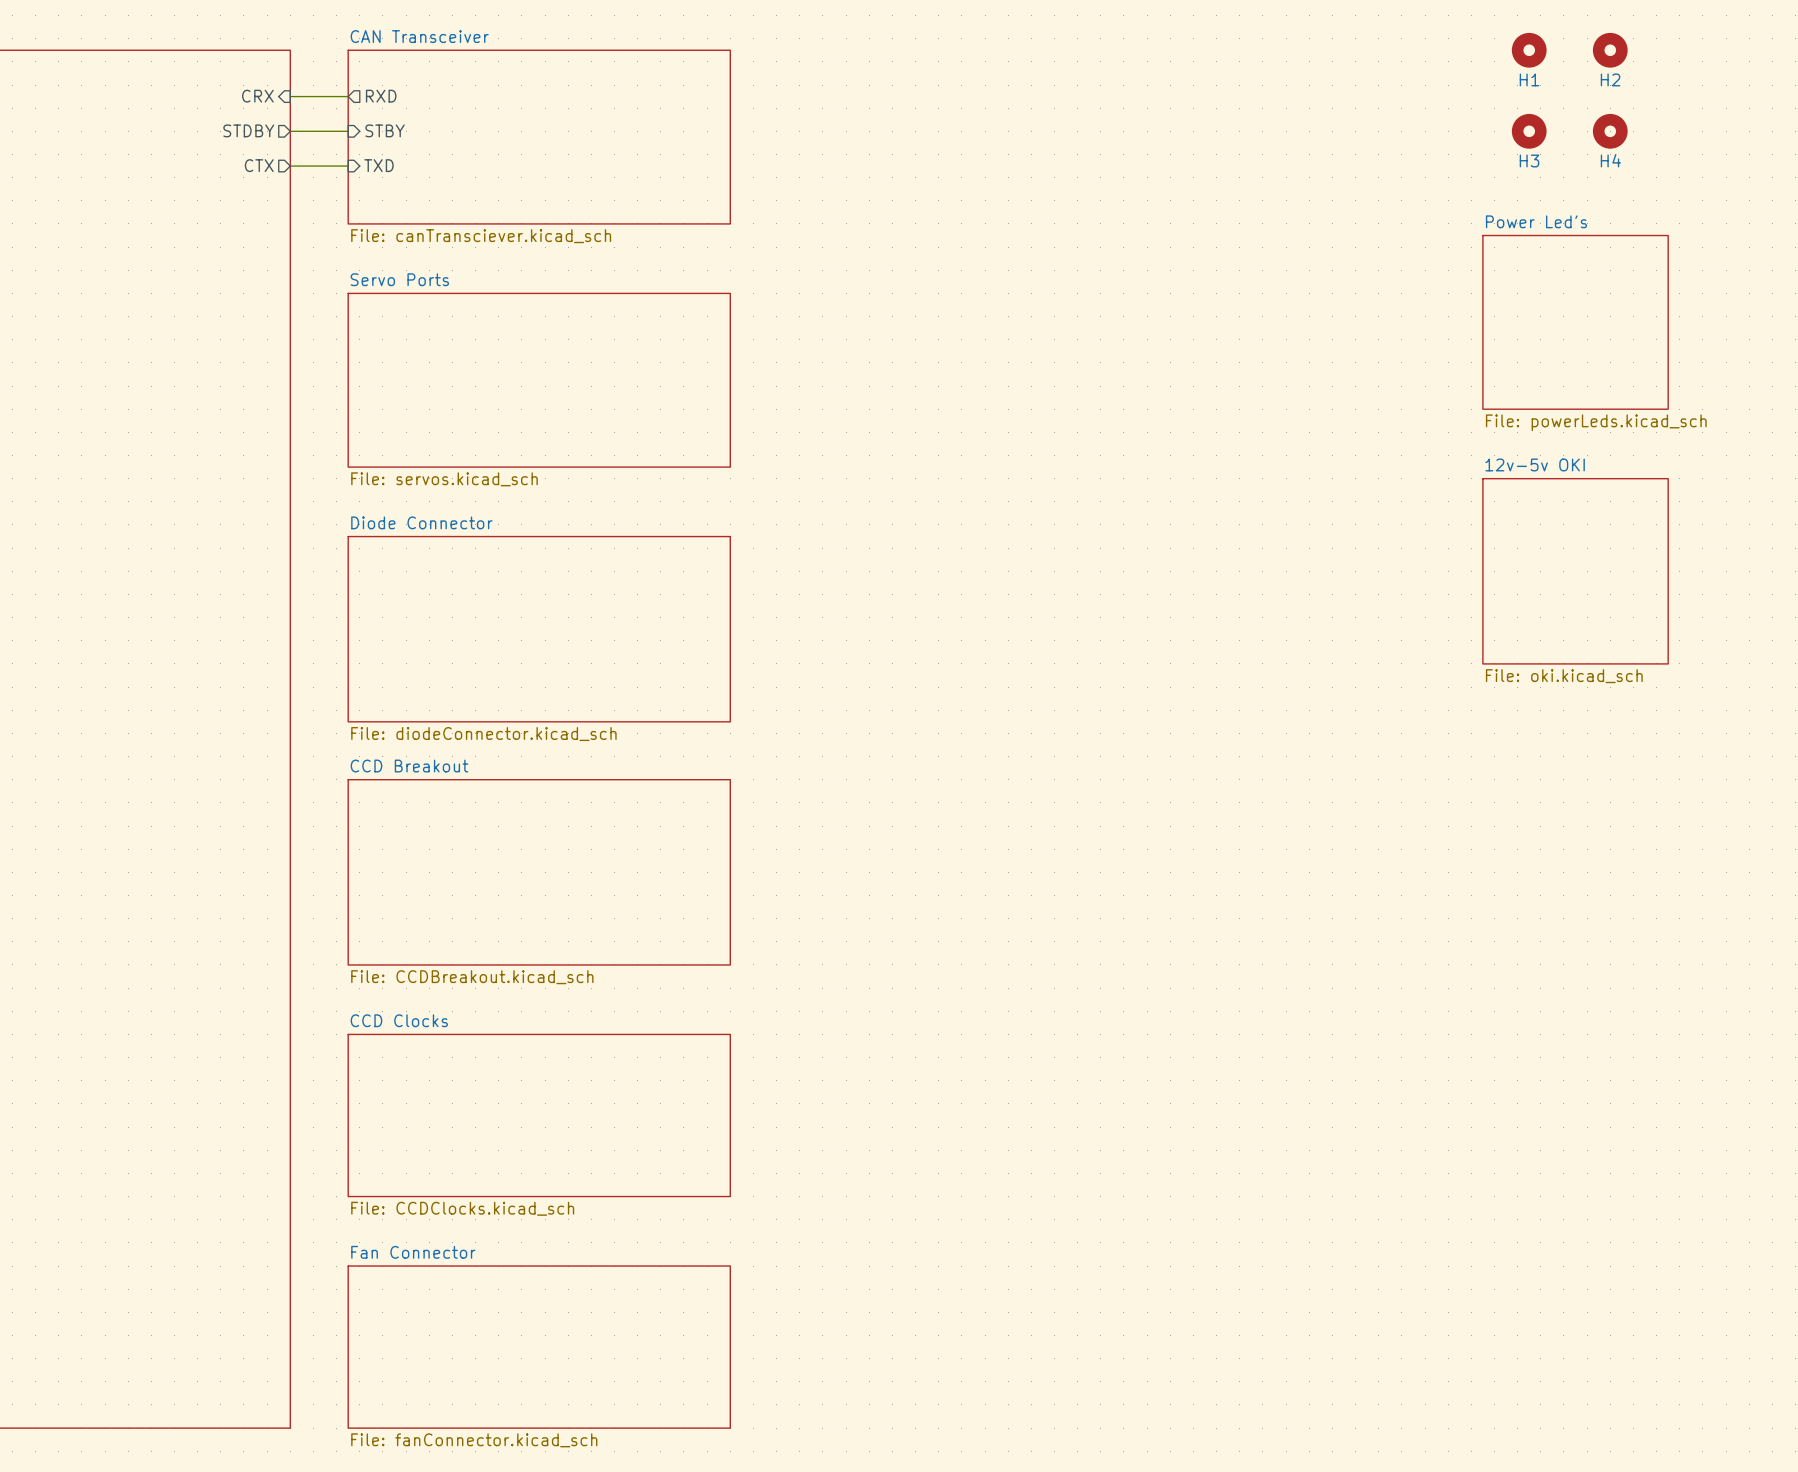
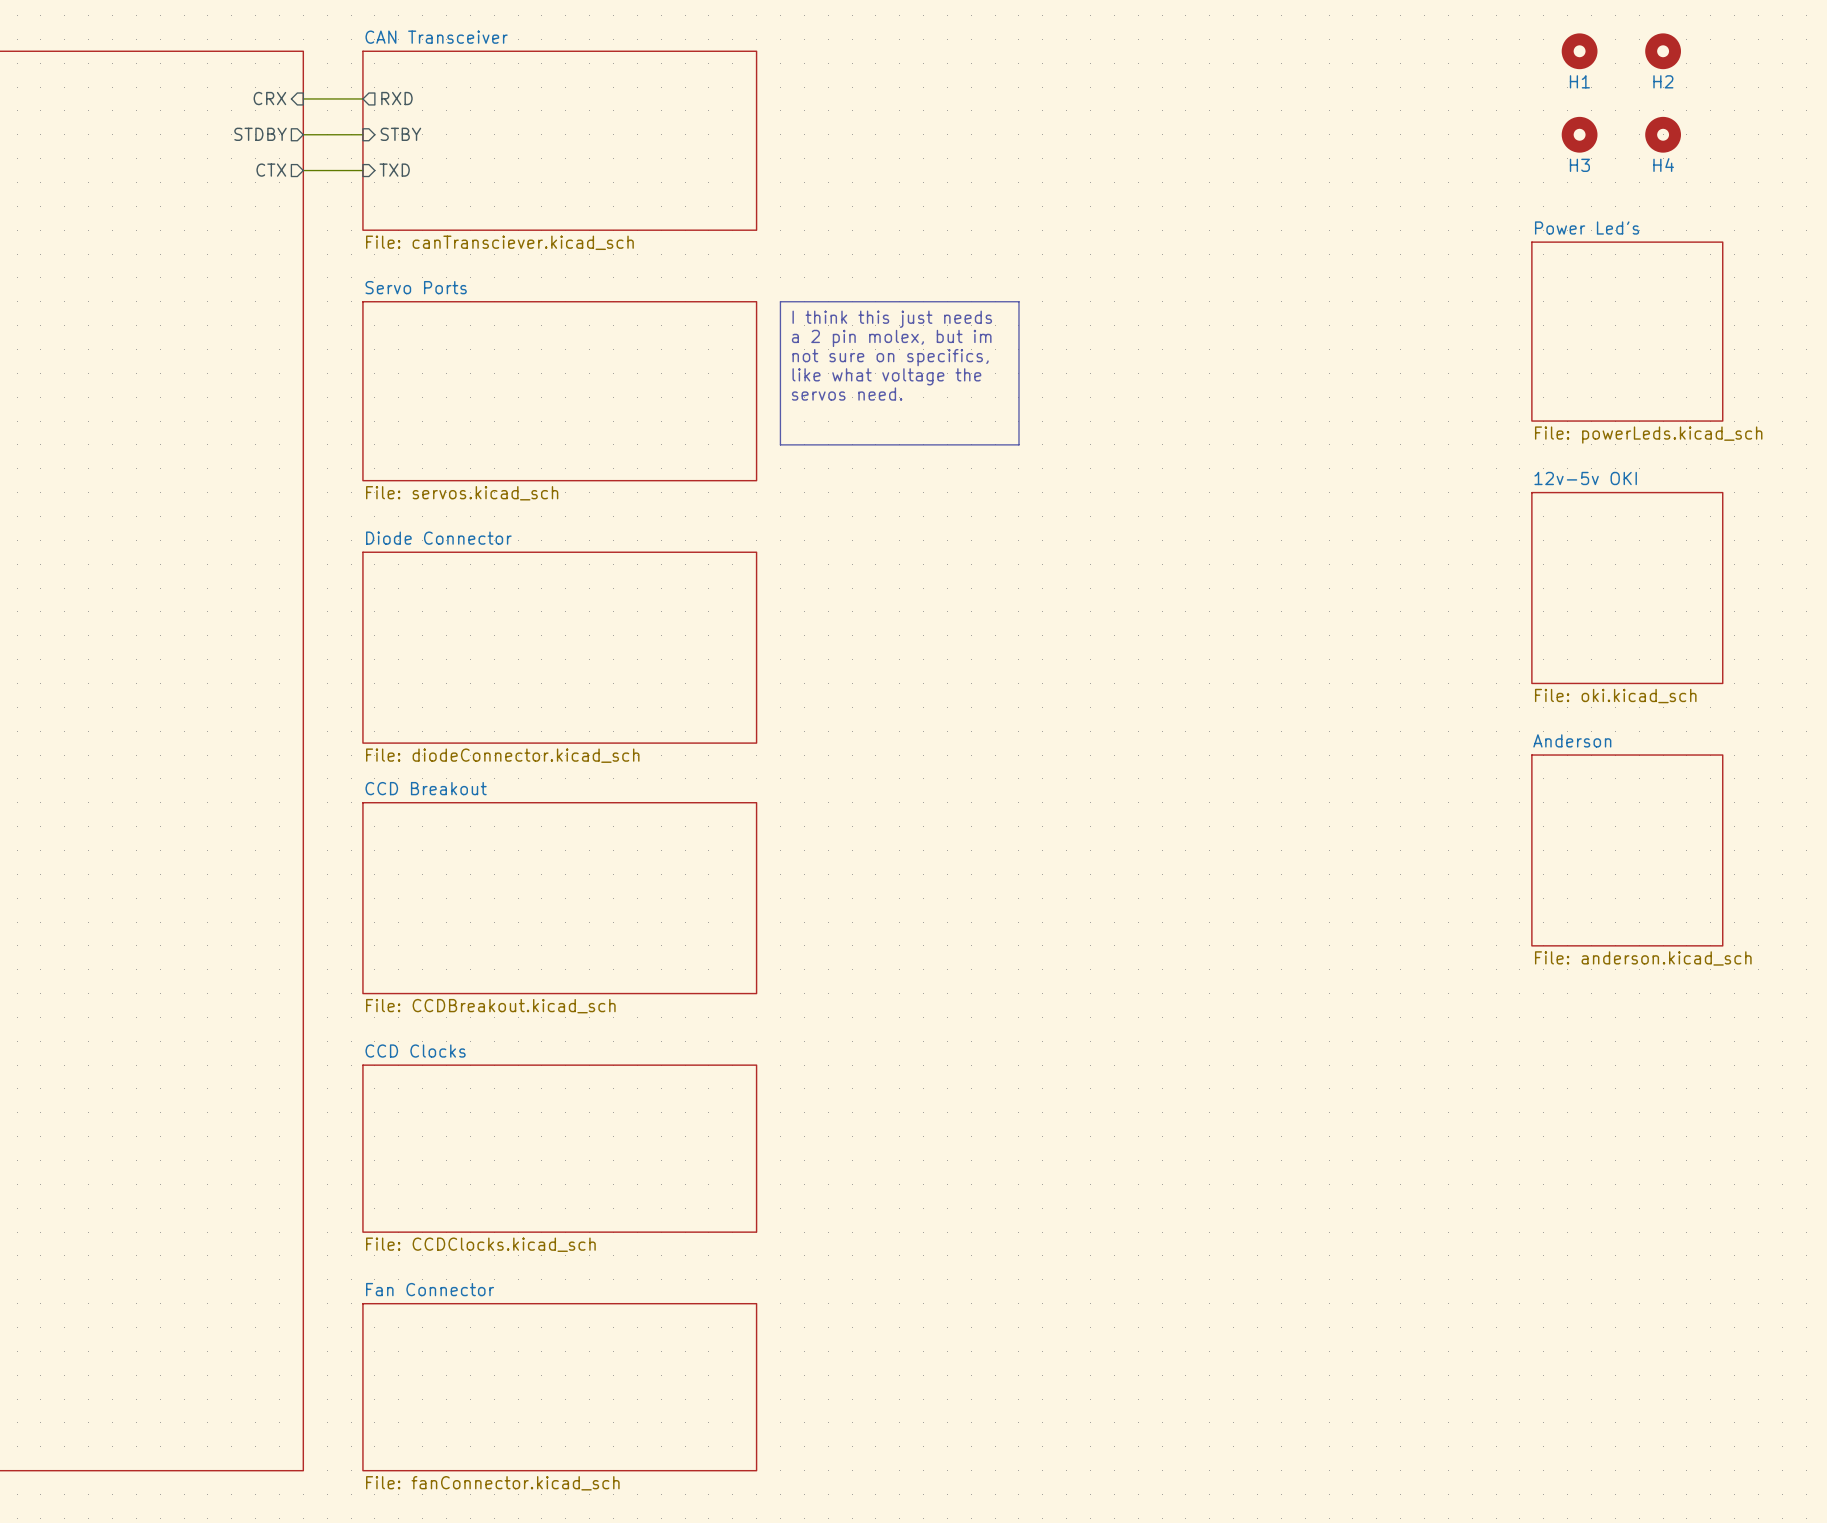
line: none -> (780, 301) (1018, 301) (1018, 444) (780, 444) (780, 301)
text: none -> I think this just needs (892, 319)
text: none -> a 2 pin molex, but im (891, 338)
text: none -> not sure on specifics, (890, 357)
text: none -> like what voltage the (886, 376)
text: none -> servos need. (847, 394)
sheet Anderson: none -> File: anderson.kicad_sch (1627, 850)

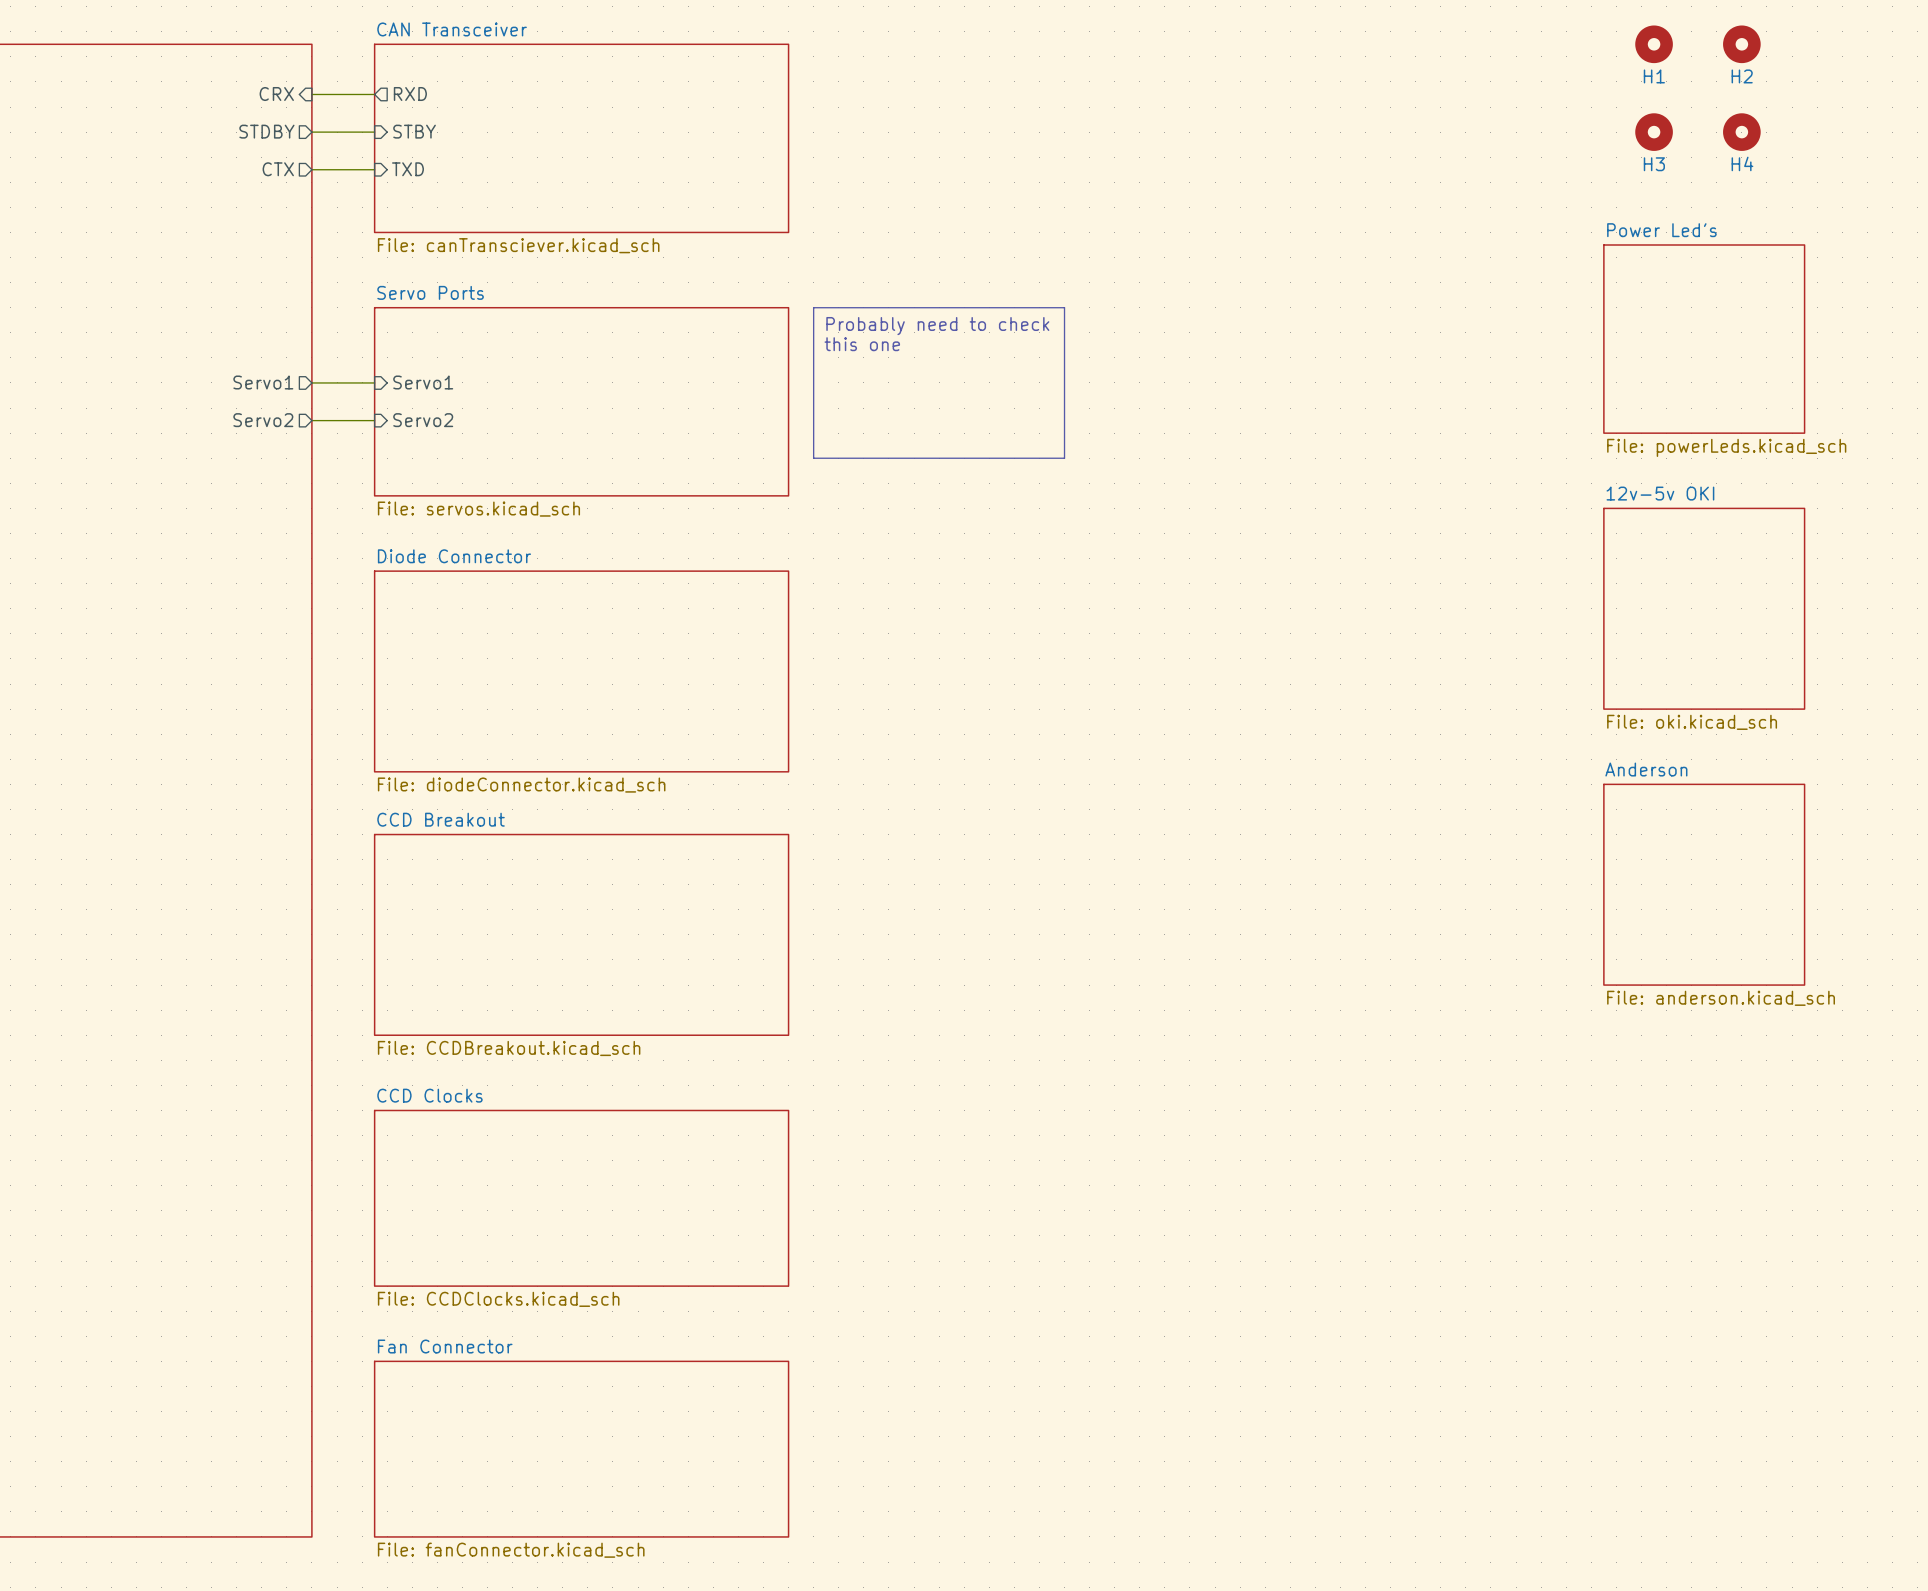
text: I think this just needs (892, 319) -> Probably need to check (937, 326)
text: a 2 pin molex, but im (891, 338) -> this one (862, 344)
text: not sure on specifics, (890, 357) -> none
sheet pin: none -> Servo1 (263, 382)
sheet pin: none -> Servo1 (423, 382)
wire: none -> (311, 382) (374, 382)
text: like what voltage the (886, 376) -> none
text: servos need. (847, 394) -> none
sheet pin: none -> Servo2 (263, 420)
sheet pin: none -> Servo2 (423, 420)
wire: none -> (311, 420) (374, 420)

